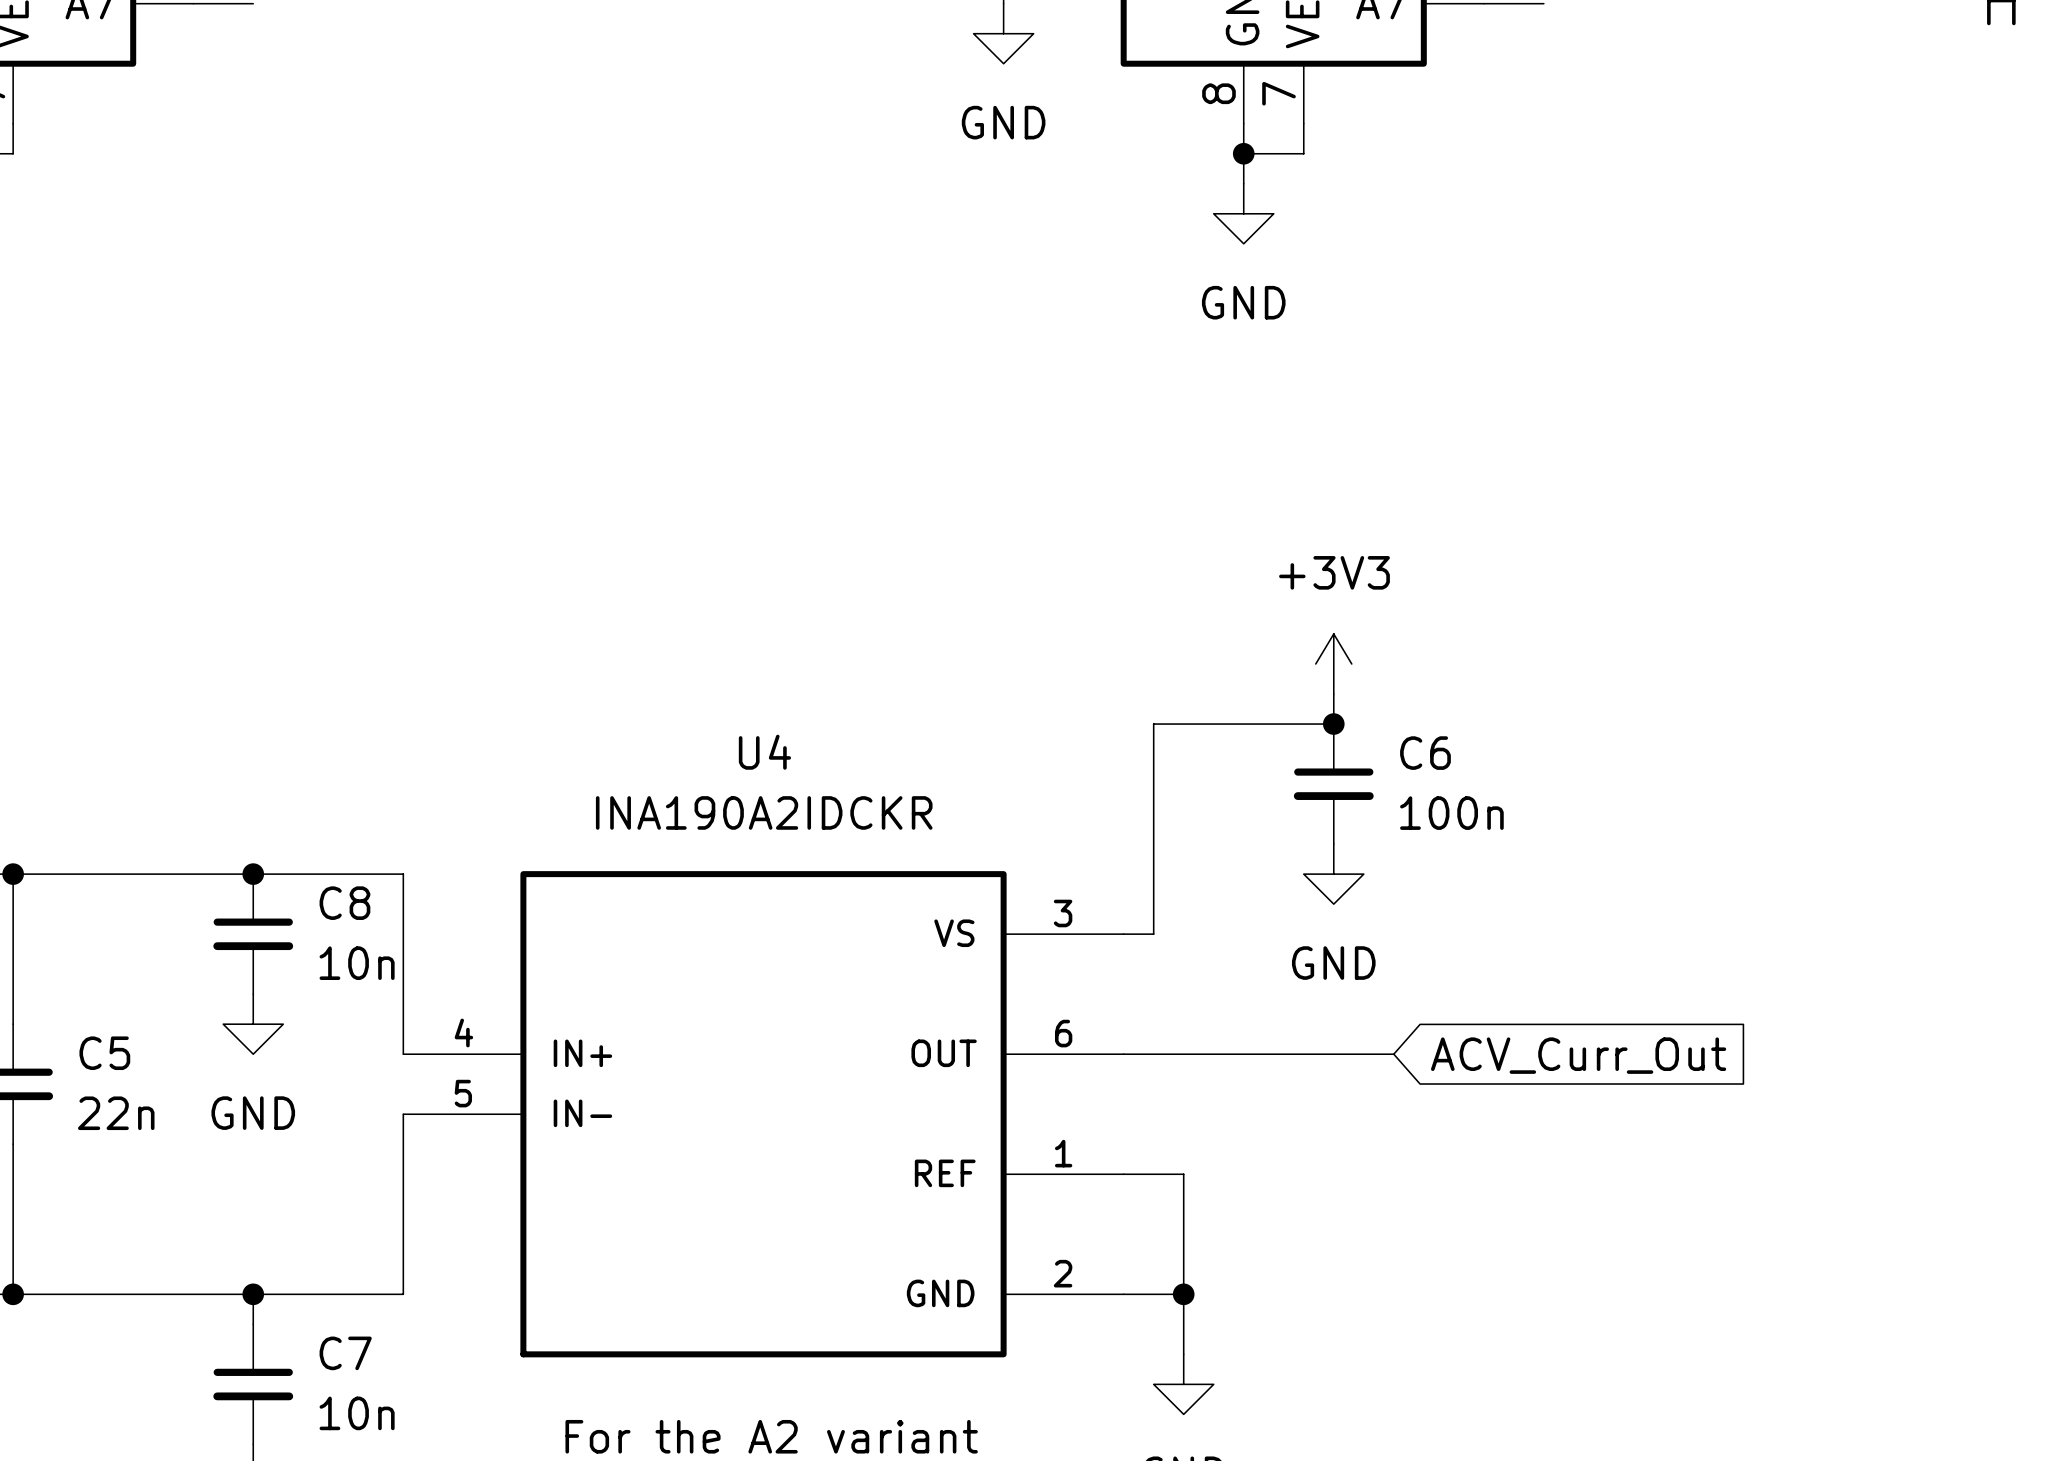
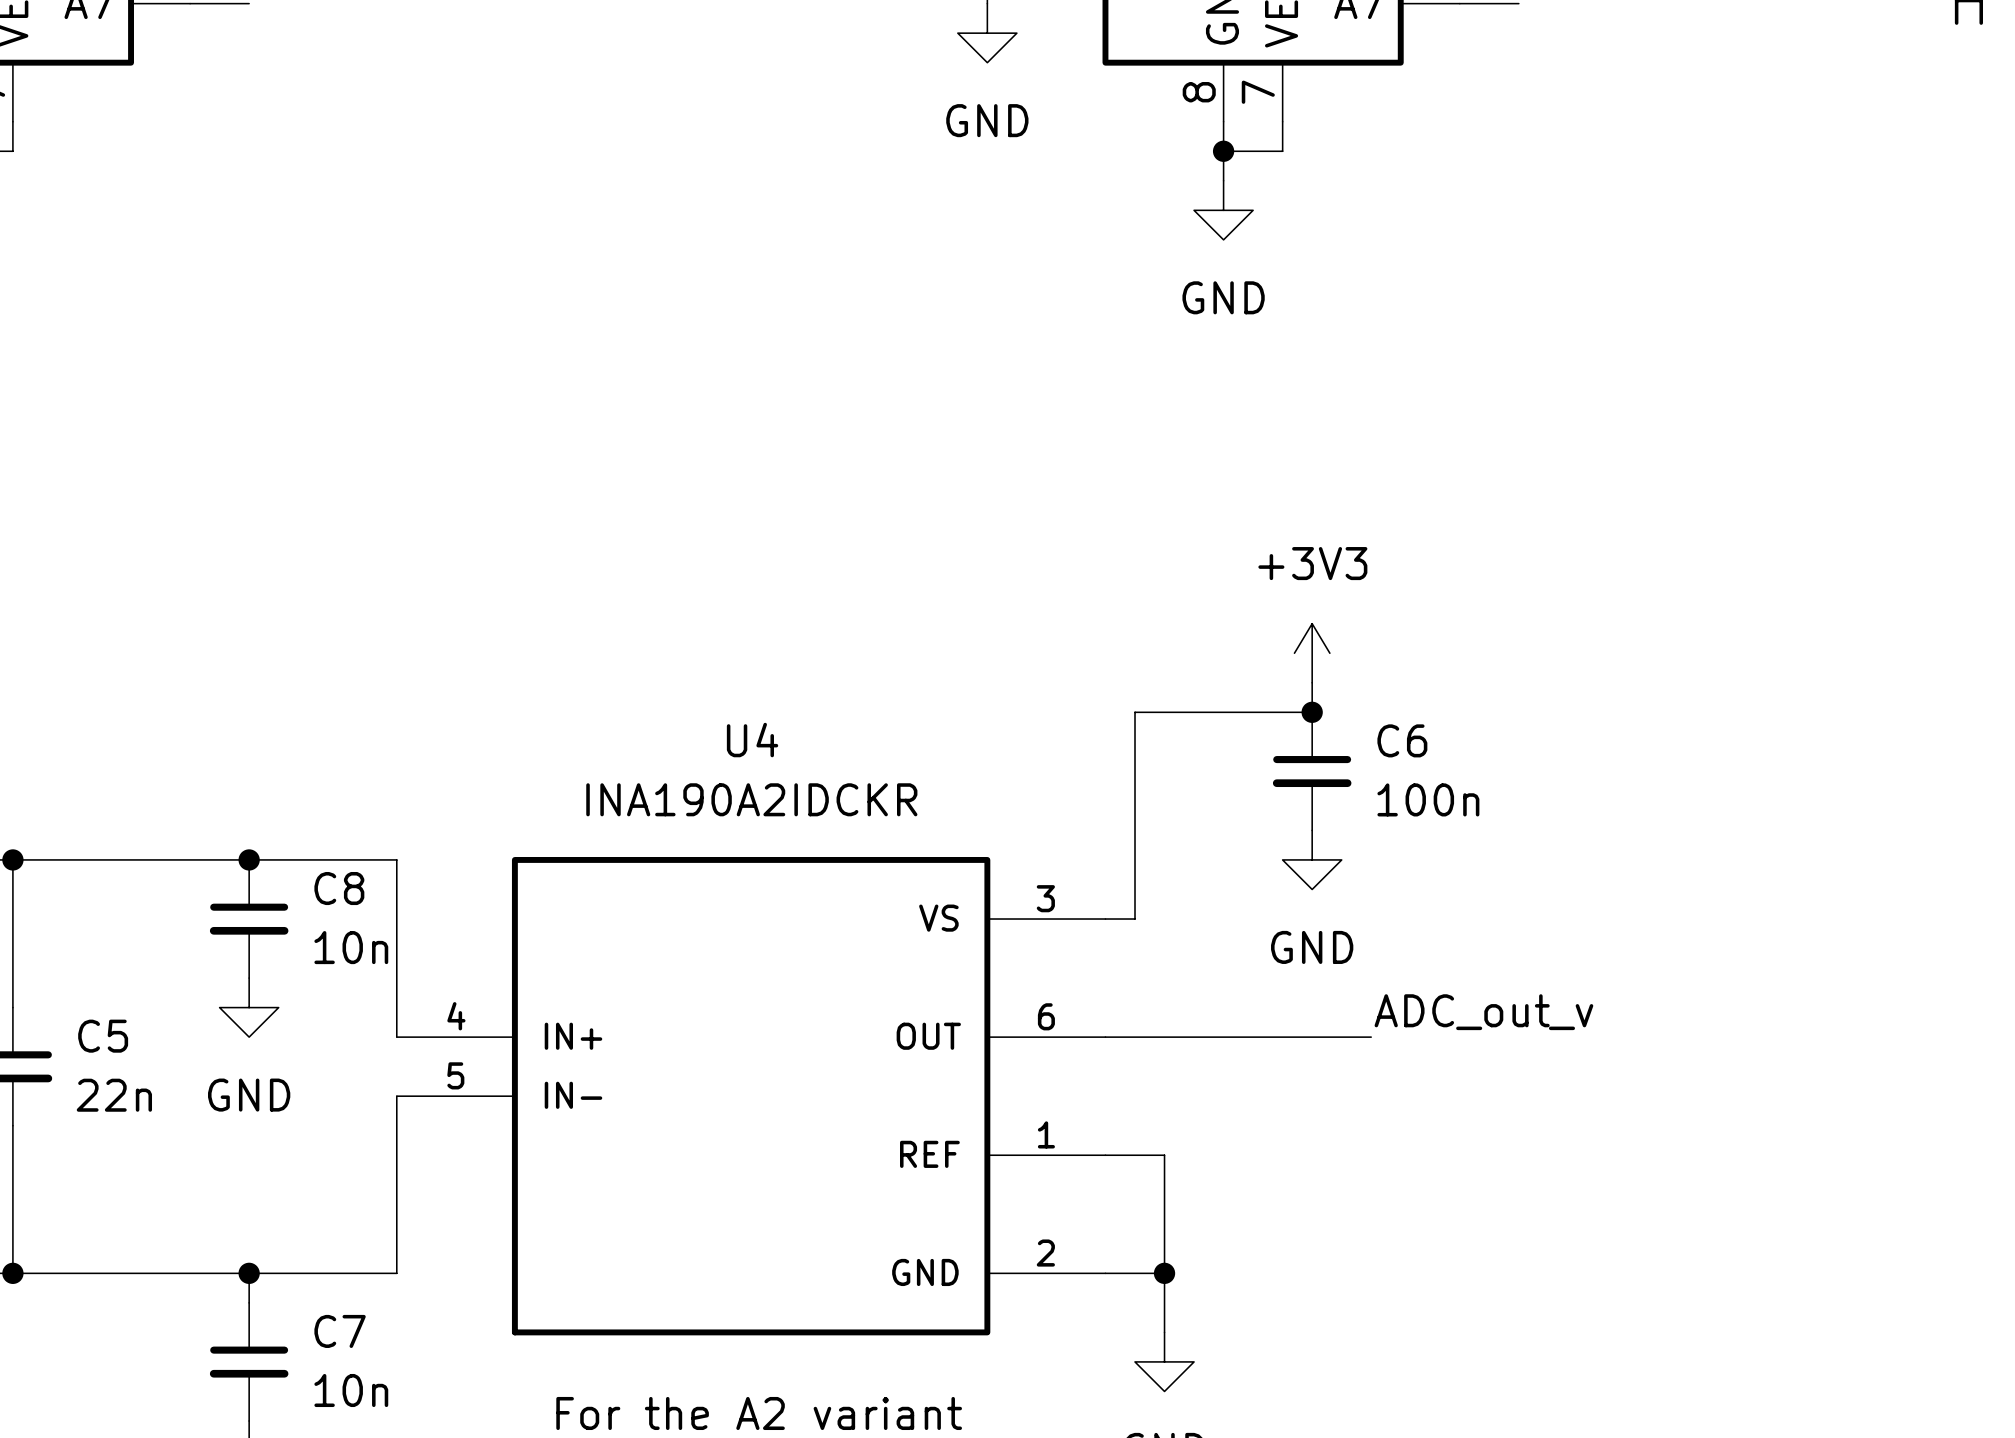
label: none -> ADC_out_v (1483, 1012)
global label: ACV_Curr_Out (1578, 1055) -> none

